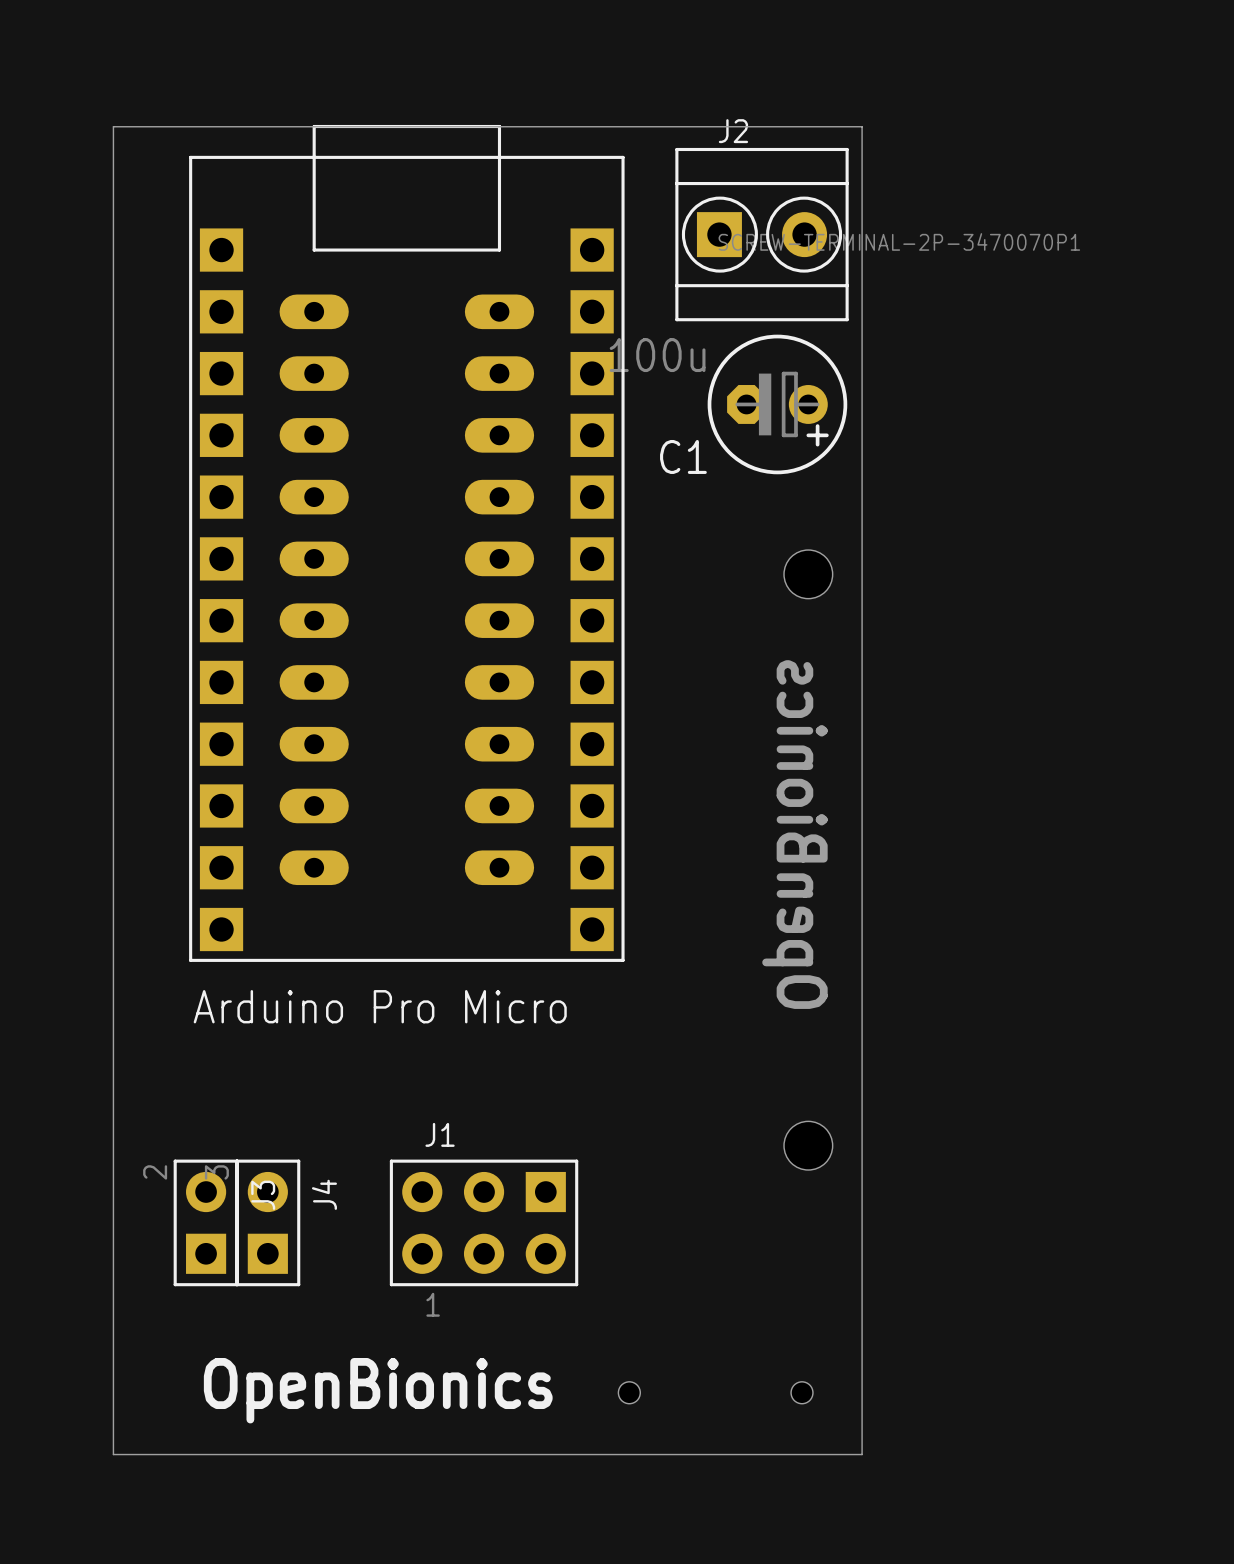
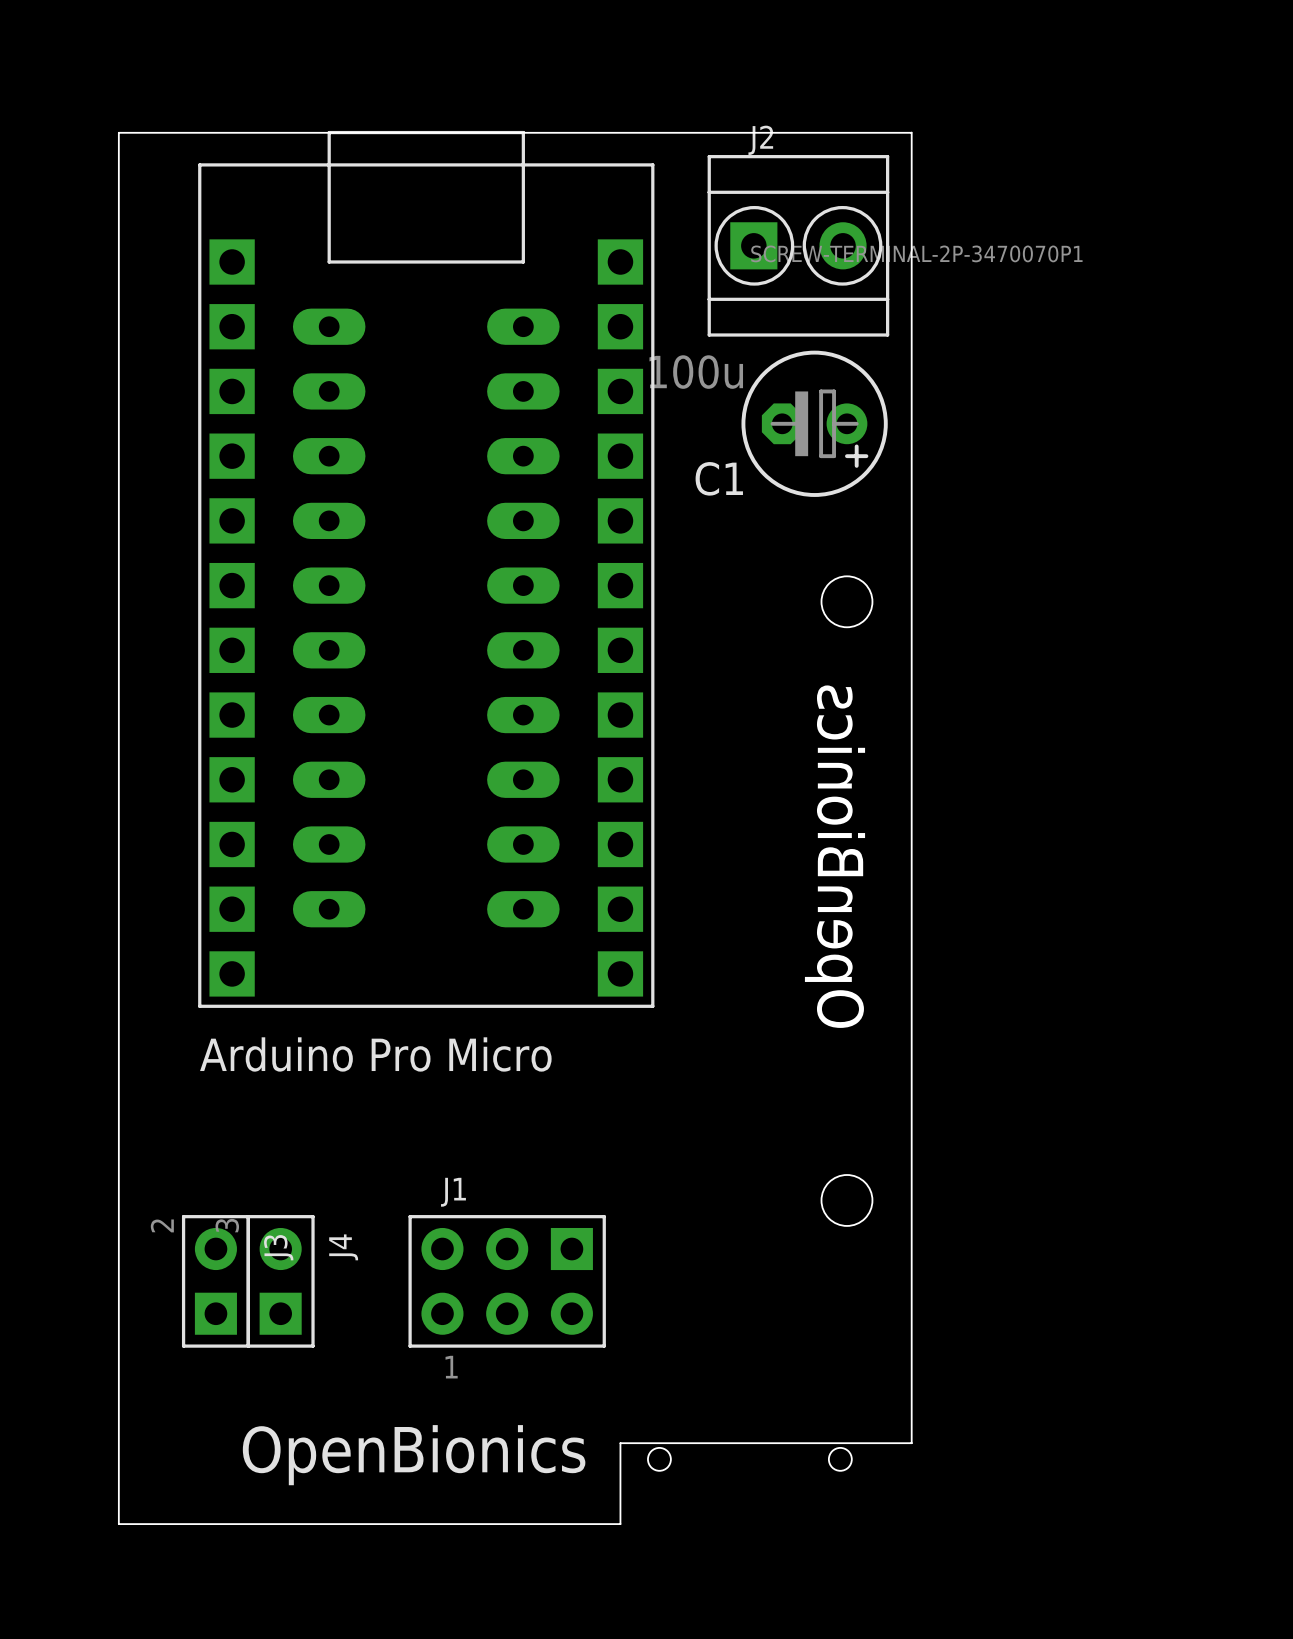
board edge: (862, 126) (862, 1454) (592, 1454) -> (911, 132) (911, 1443) (620, 1443) (620, 1524)
board edge: none -> (903, 132) (911, 132)

